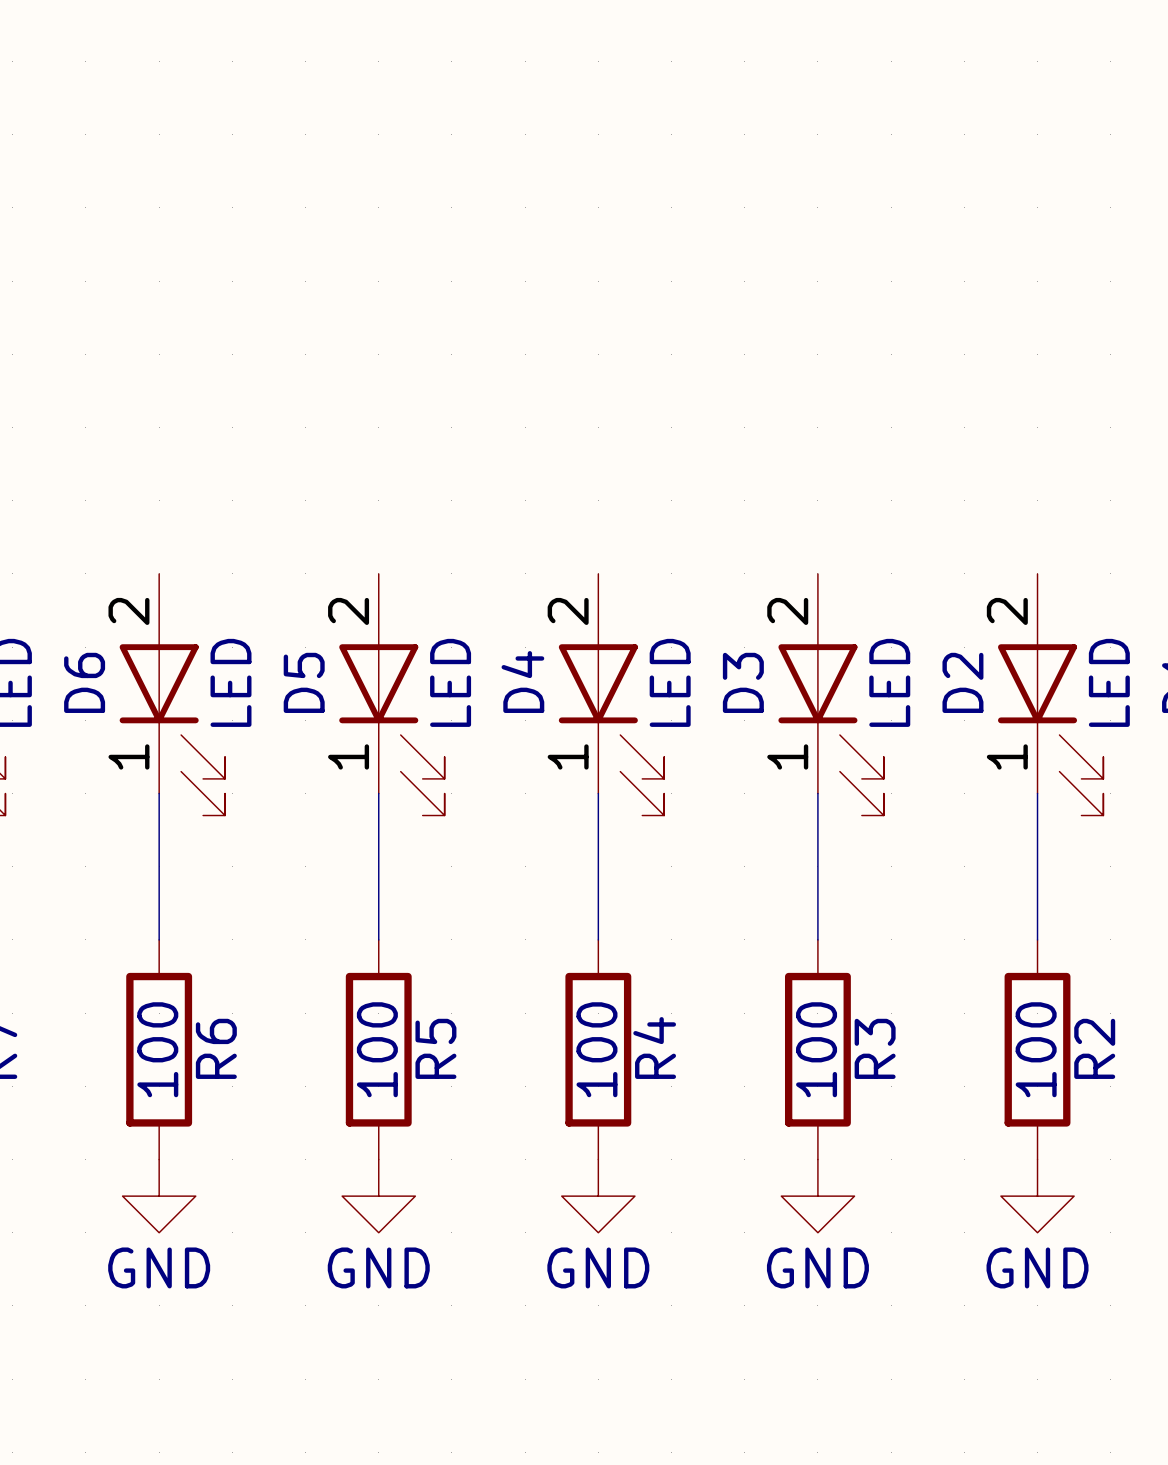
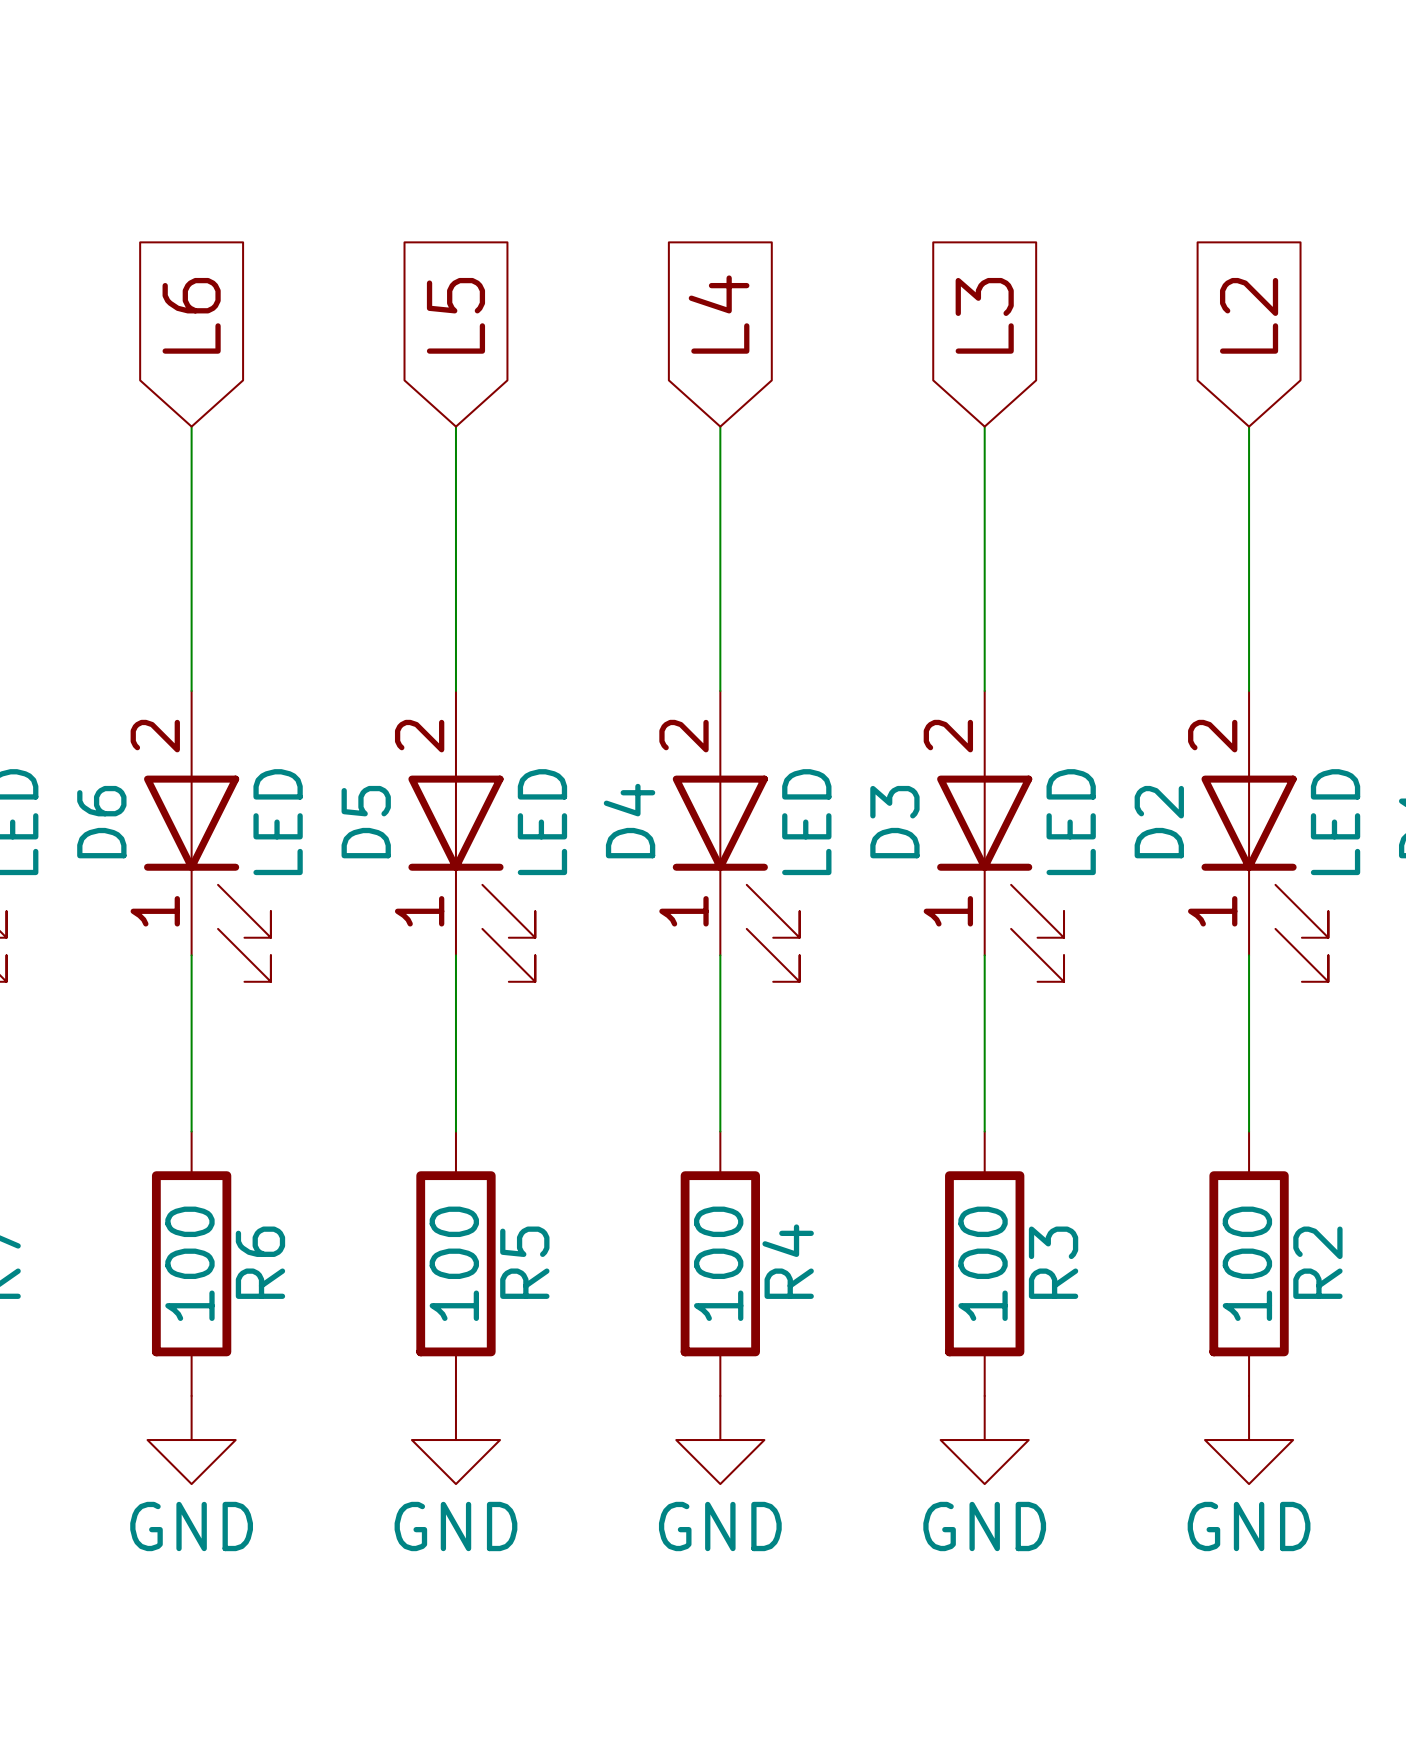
global label: none -> L4 (719, 314)
global label: none -> L6 (191, 315)
global label: none -> L5 (455, 315)
global label: none -> L3 (984, 315)
global label: none -> L2 (1249, 315)
wire: none -> (191, 426) (191, 690)
wire: none -> (455, 426) (455, 690)
wire: none -> (720, 426) (720, 690)
wire: none -> (984, 426) (984, 690)
wire: none -> (1249, 426) (1249, 690)

